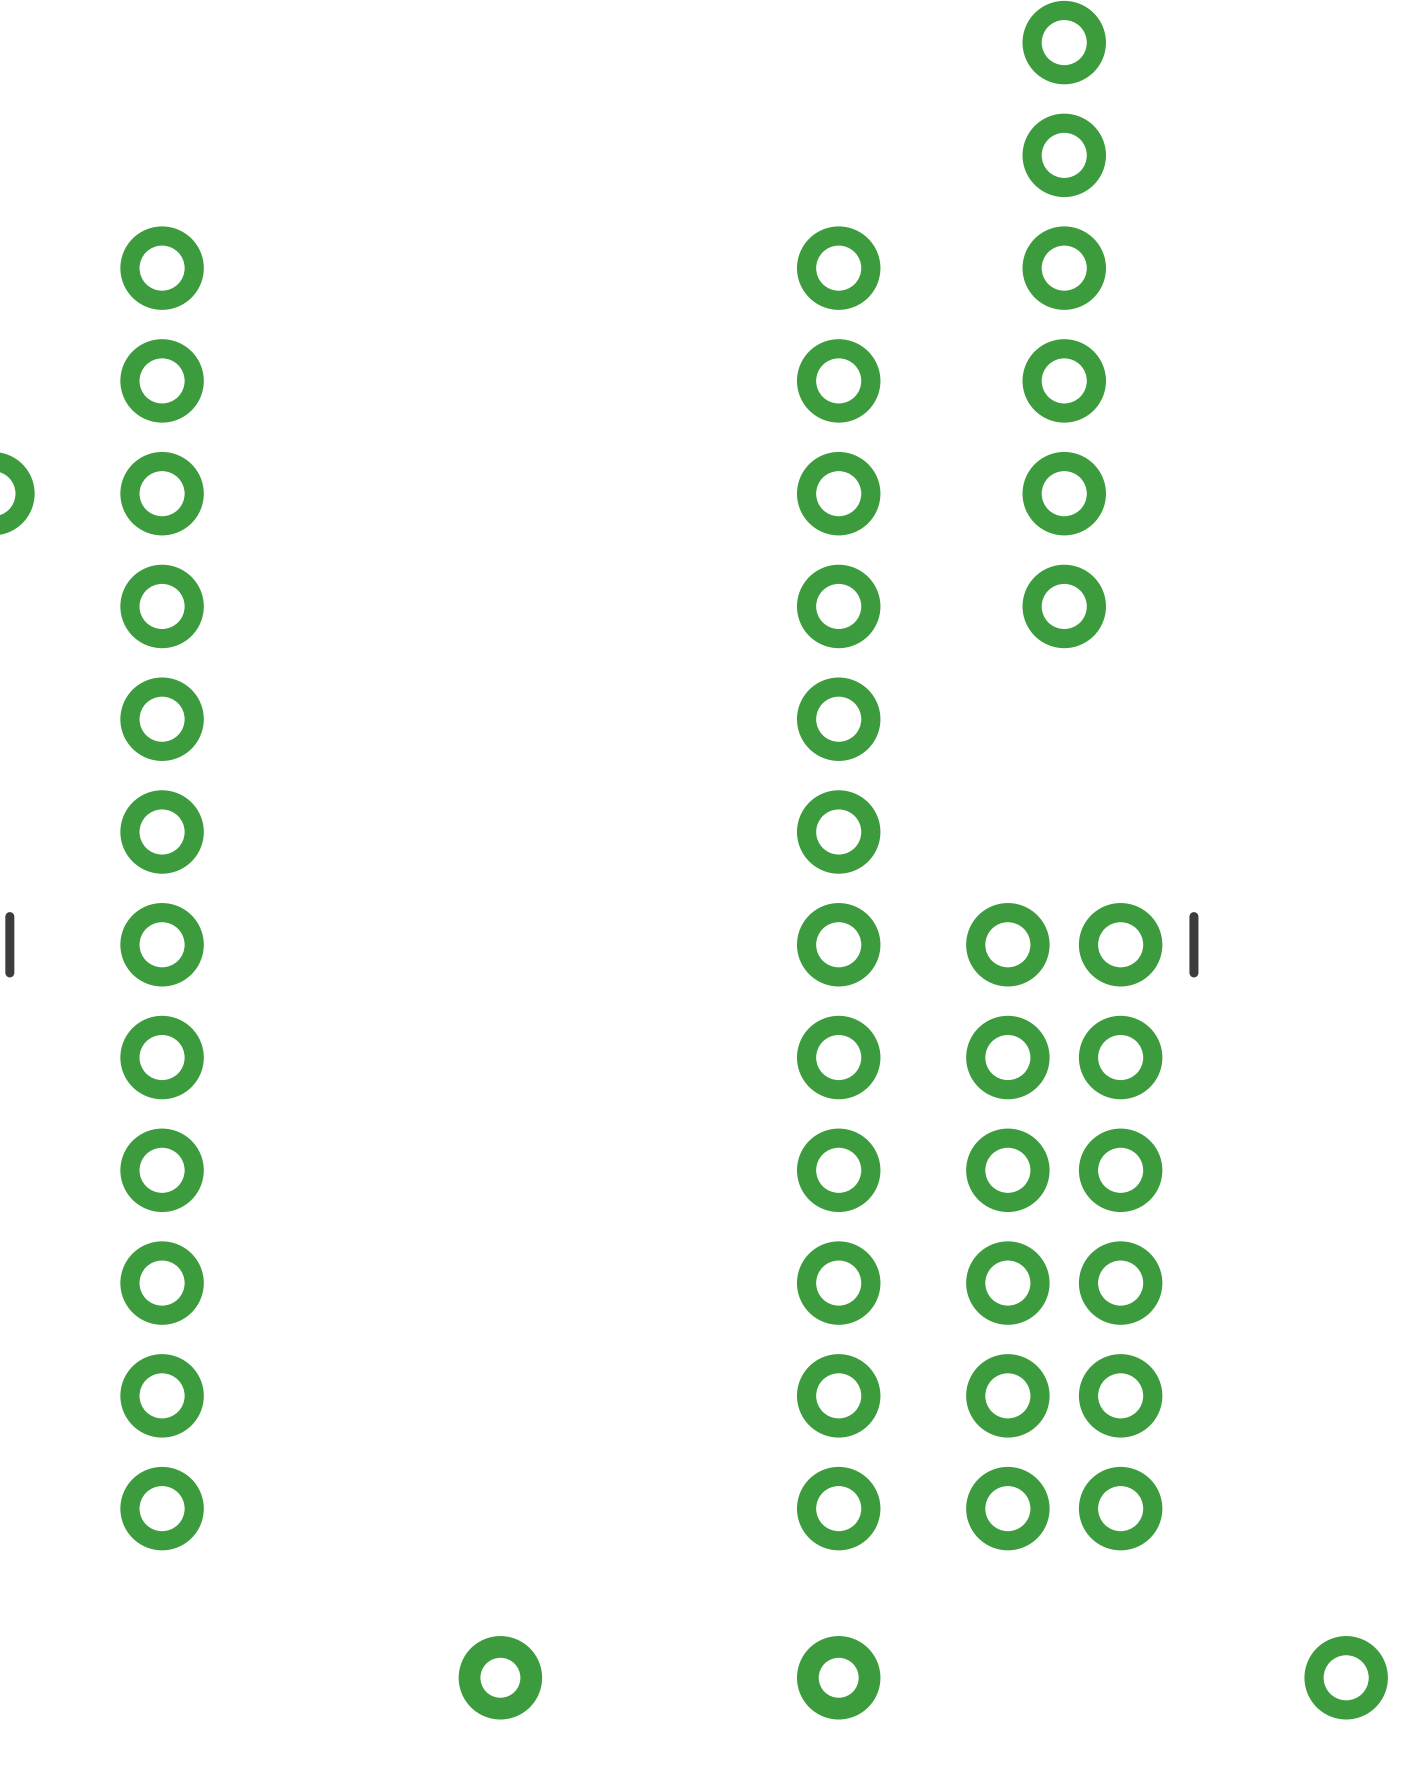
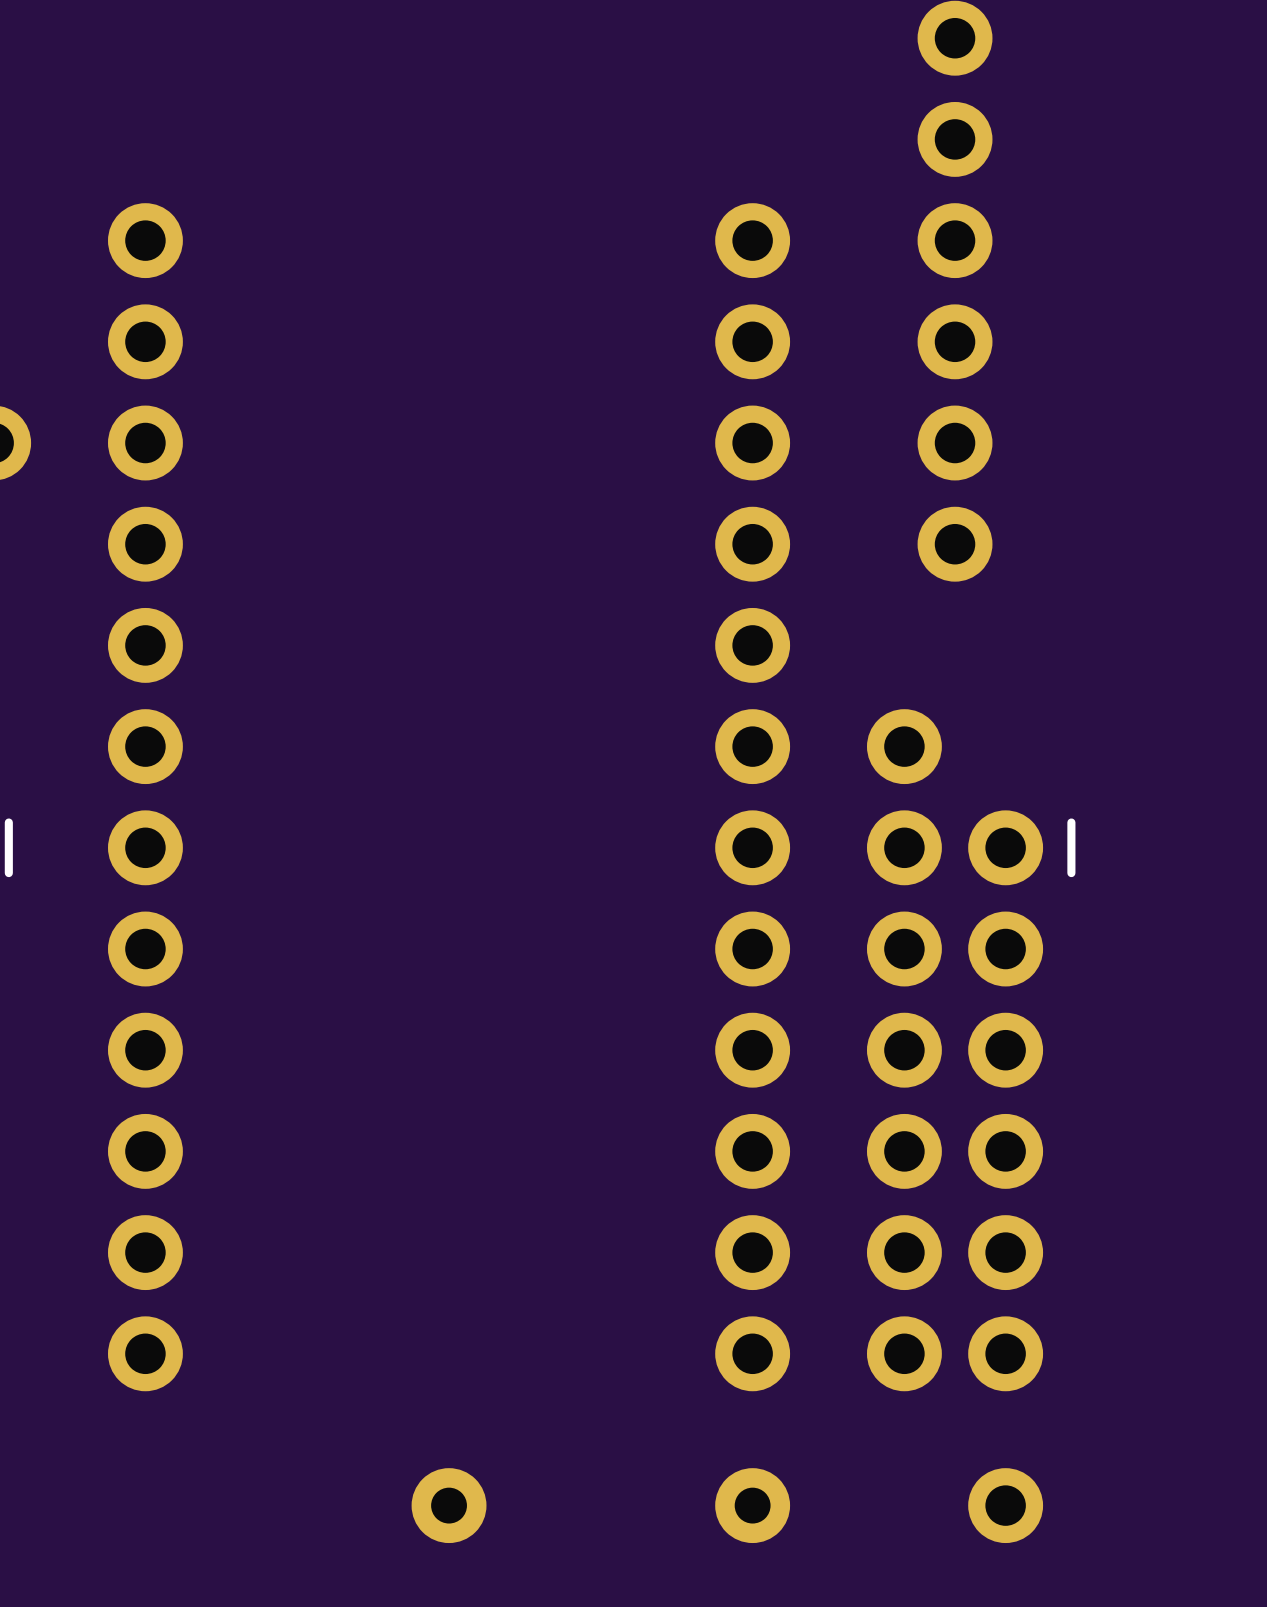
part: none -> (904, 746)
part position: (1346, 1677) -> (1005, 1505)

